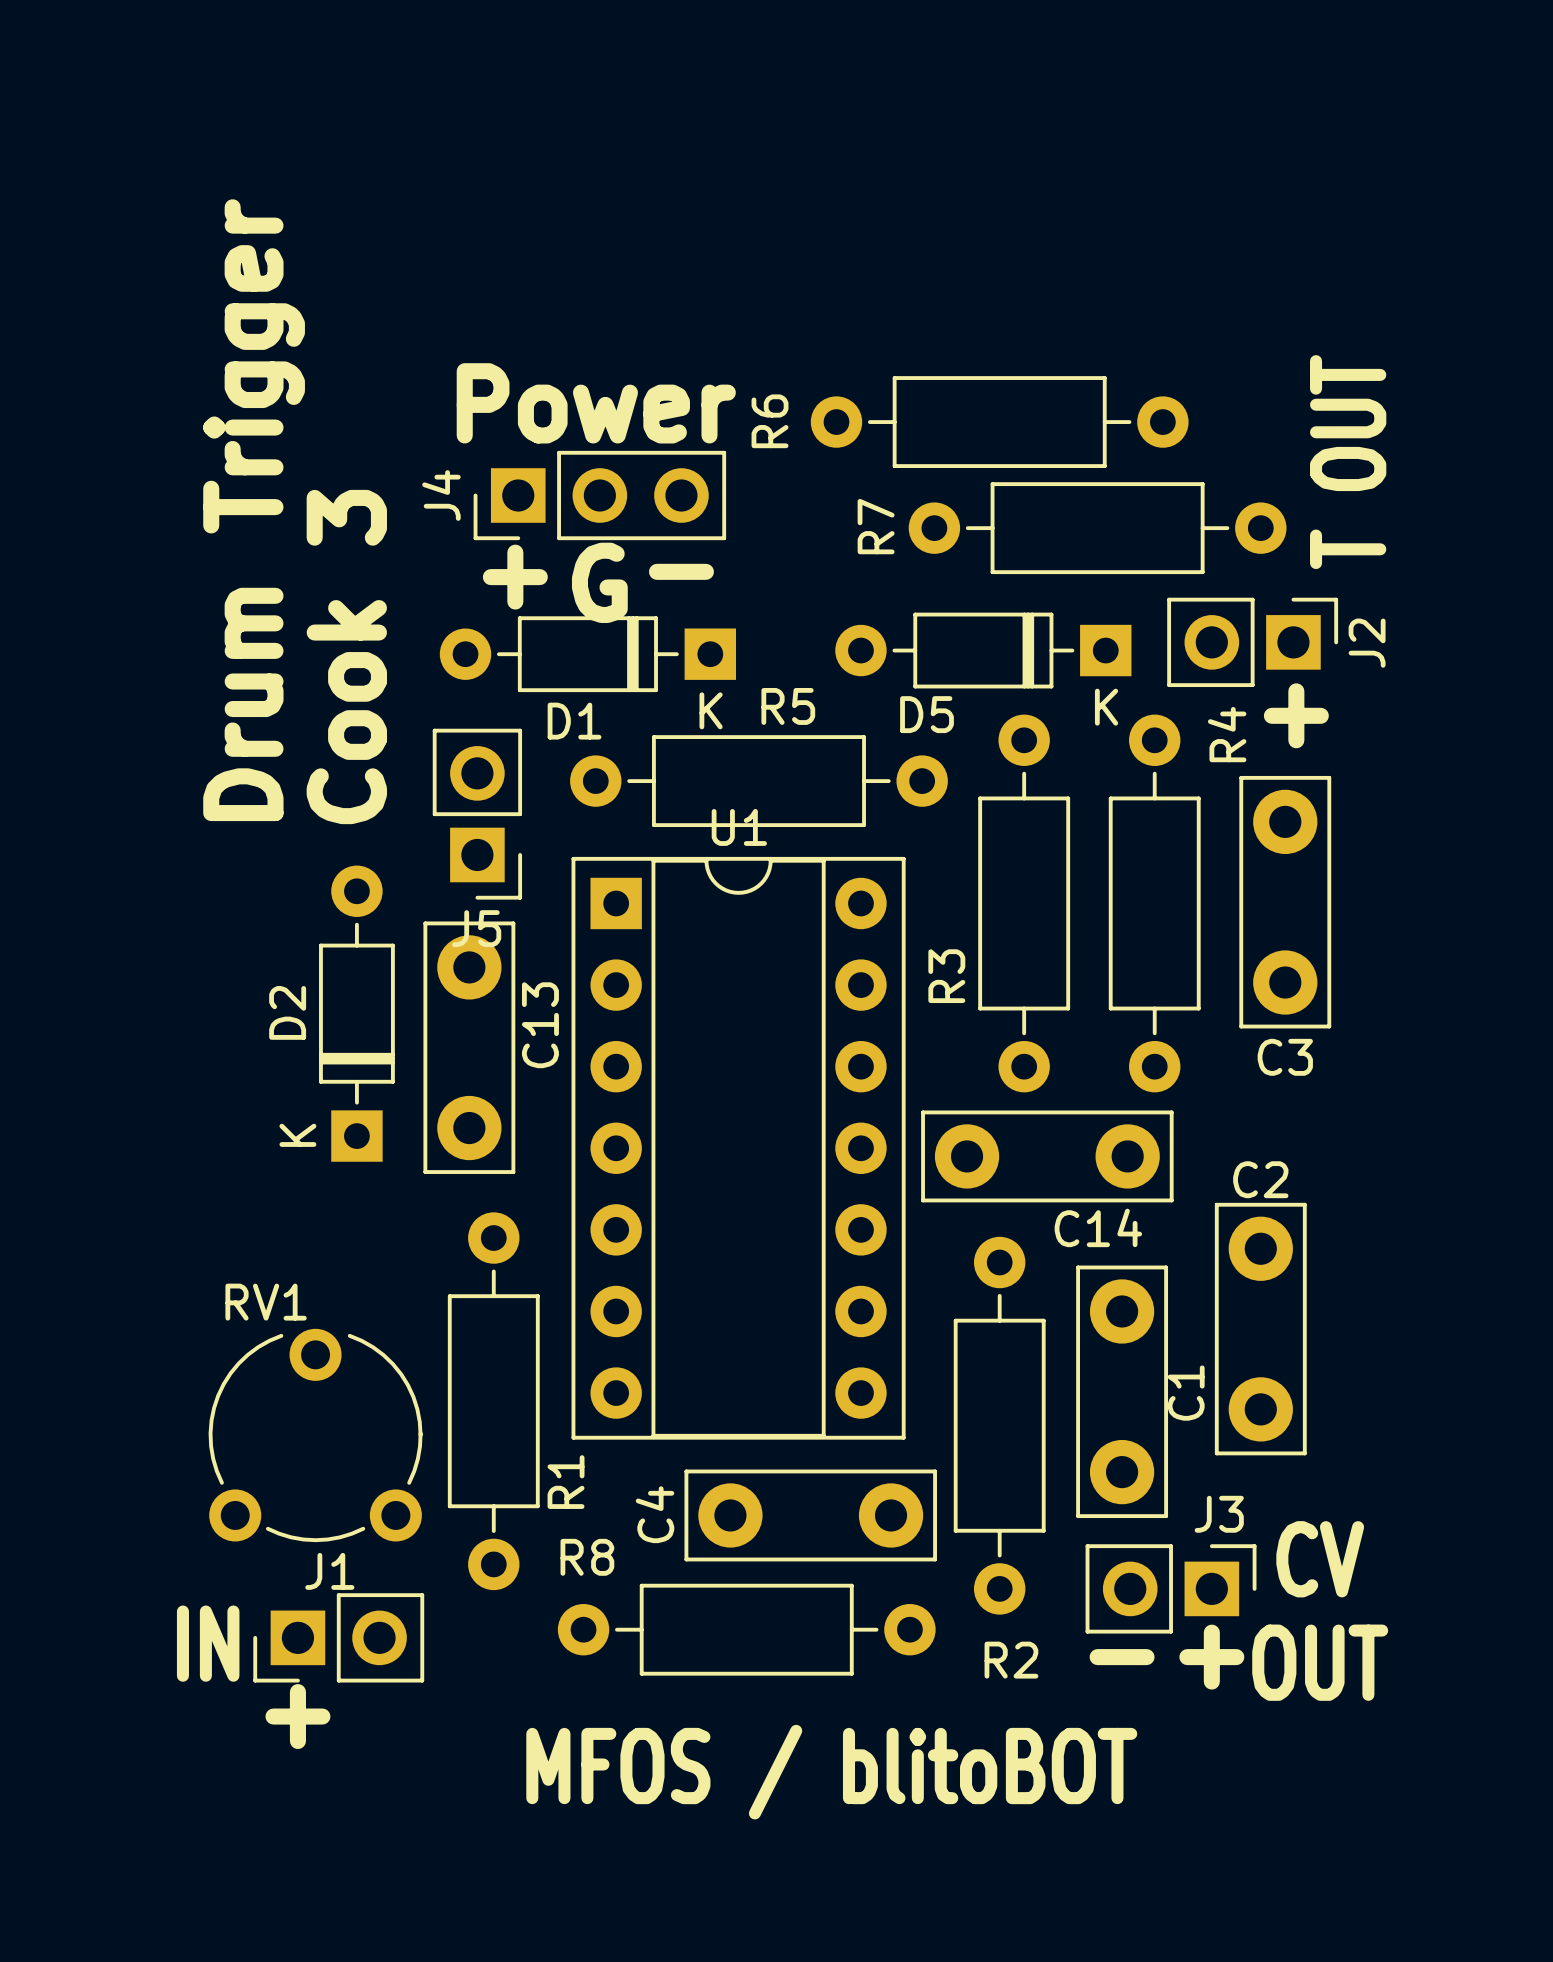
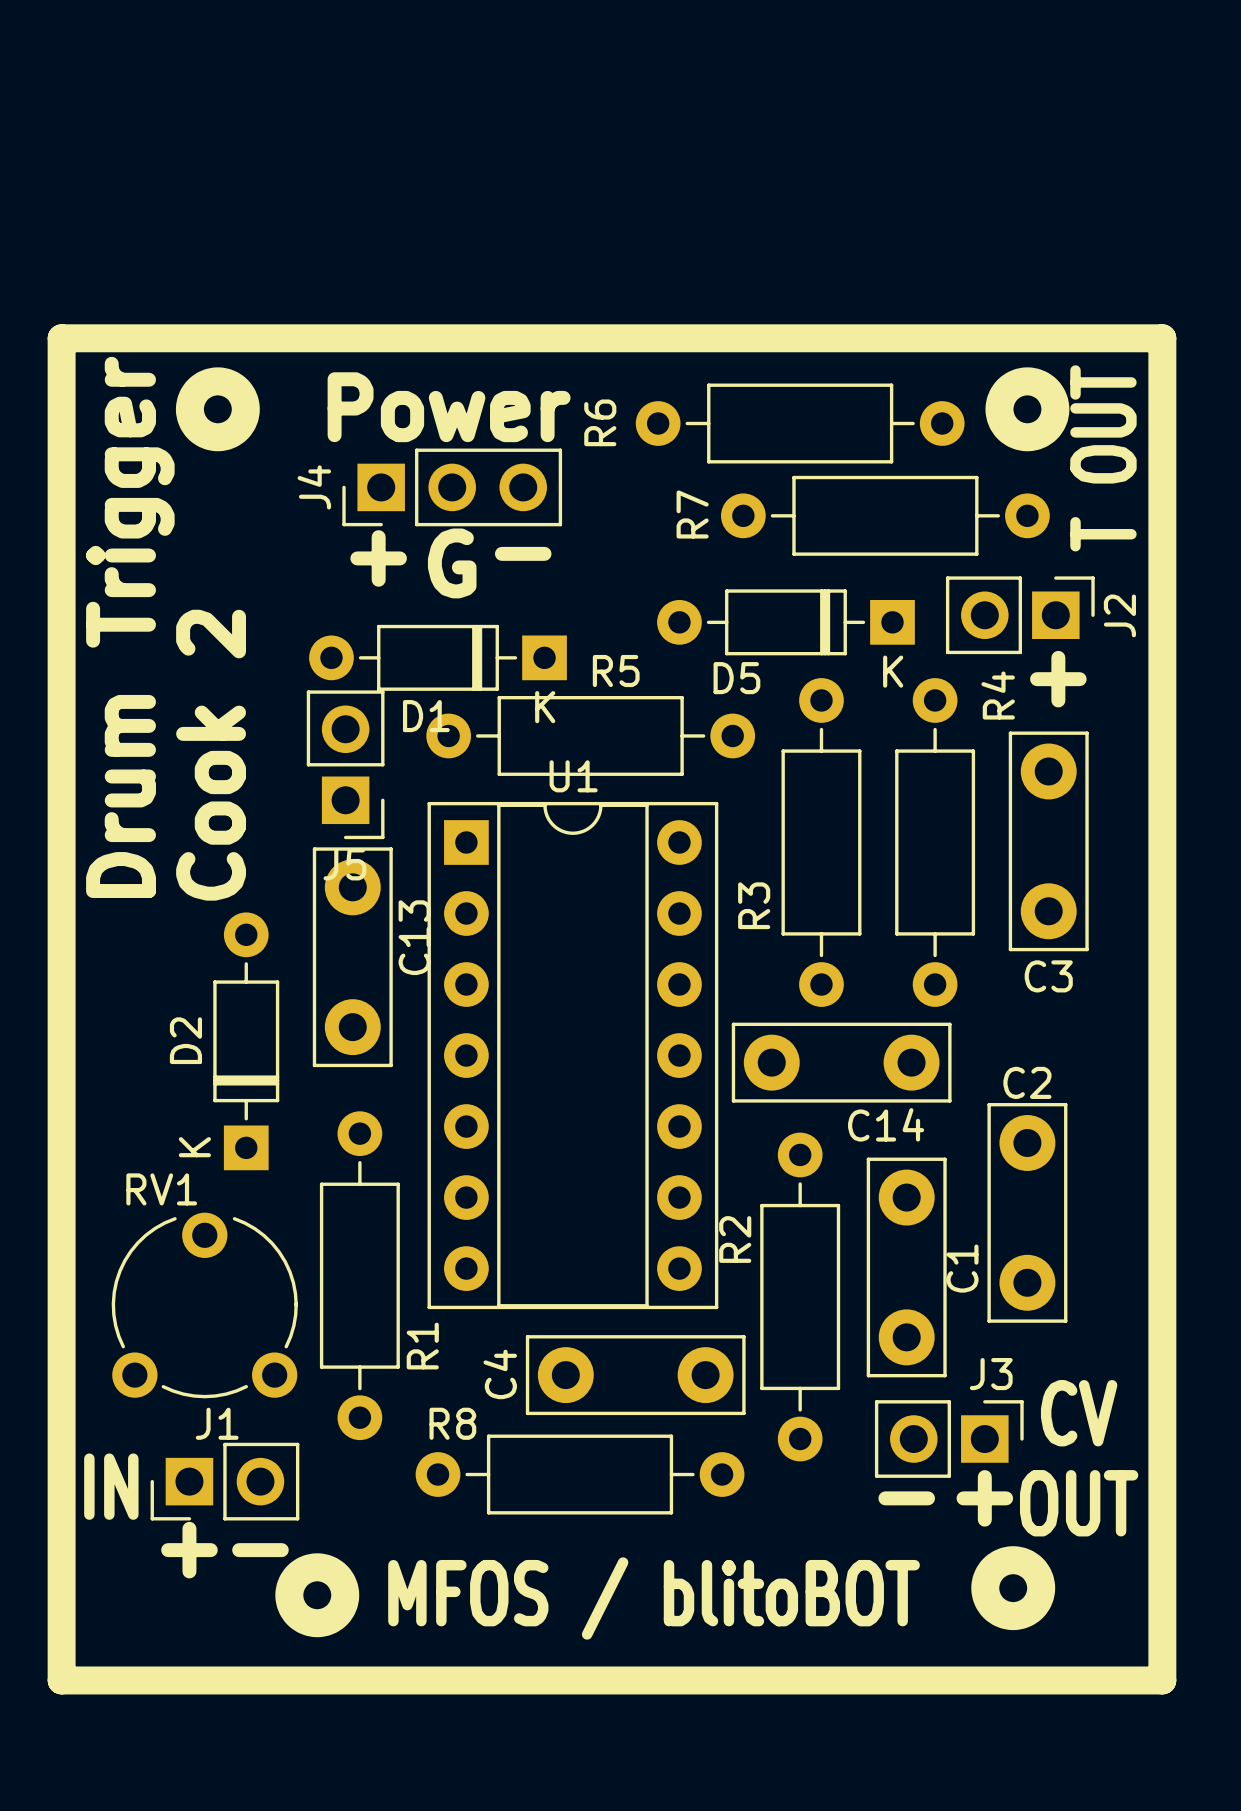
line: none -> (61, 338) (1162, 338) (1162, 1680) (61, 1680) (61, 338)
drawing: none -> [175, 367, 260, 452]
drawing: none -> [985, 367, 1070, 452]
text position: Drum Trigger (254, 510) -> Drum Trigger (130, 627)
D1 position: (587, 654) -> (438, 657)
text: Cook 3 (346, 657) -> Cook 2 (211, 755)
D2 position: (356, 1013) -> (246, 1041)
C13 position: (469, 1047) -> (352, 957)
R8 name position: R8 (587, 1557) -> R8 (452, 1423)
R2 name rotation: 0° (1011, 1660) -> 90° counterclockwise (735, 1239)
R2 name position: R2 (1011, 1660) -> R2 (735, 1239)
drawing: none -> [971, 1546, 1056, 1631]
text: none -> - (260, 1550)
drawing: none -> [275, 1553, 360, 1638]

